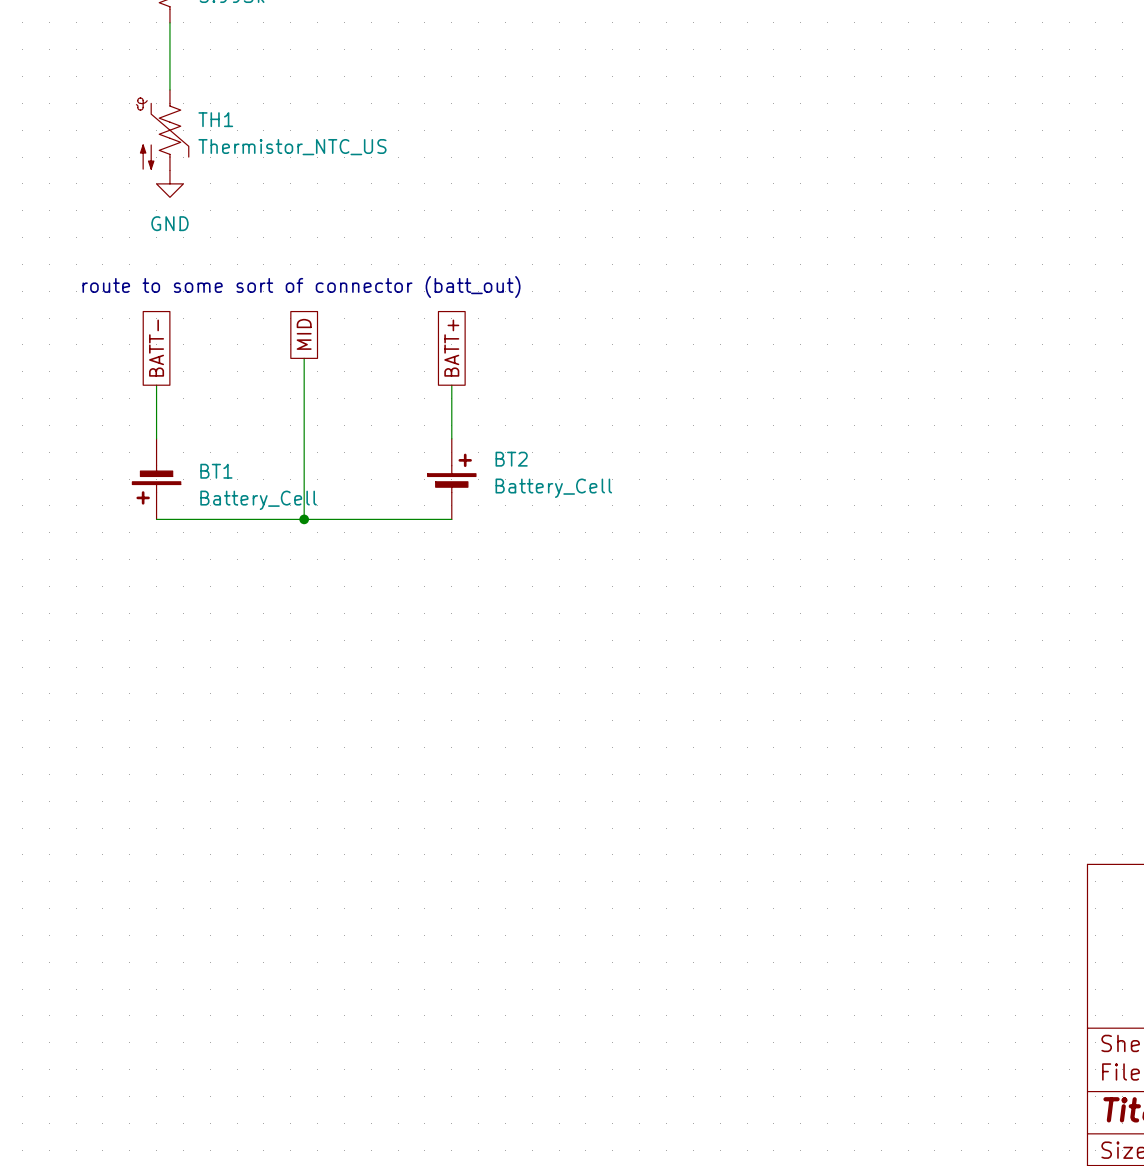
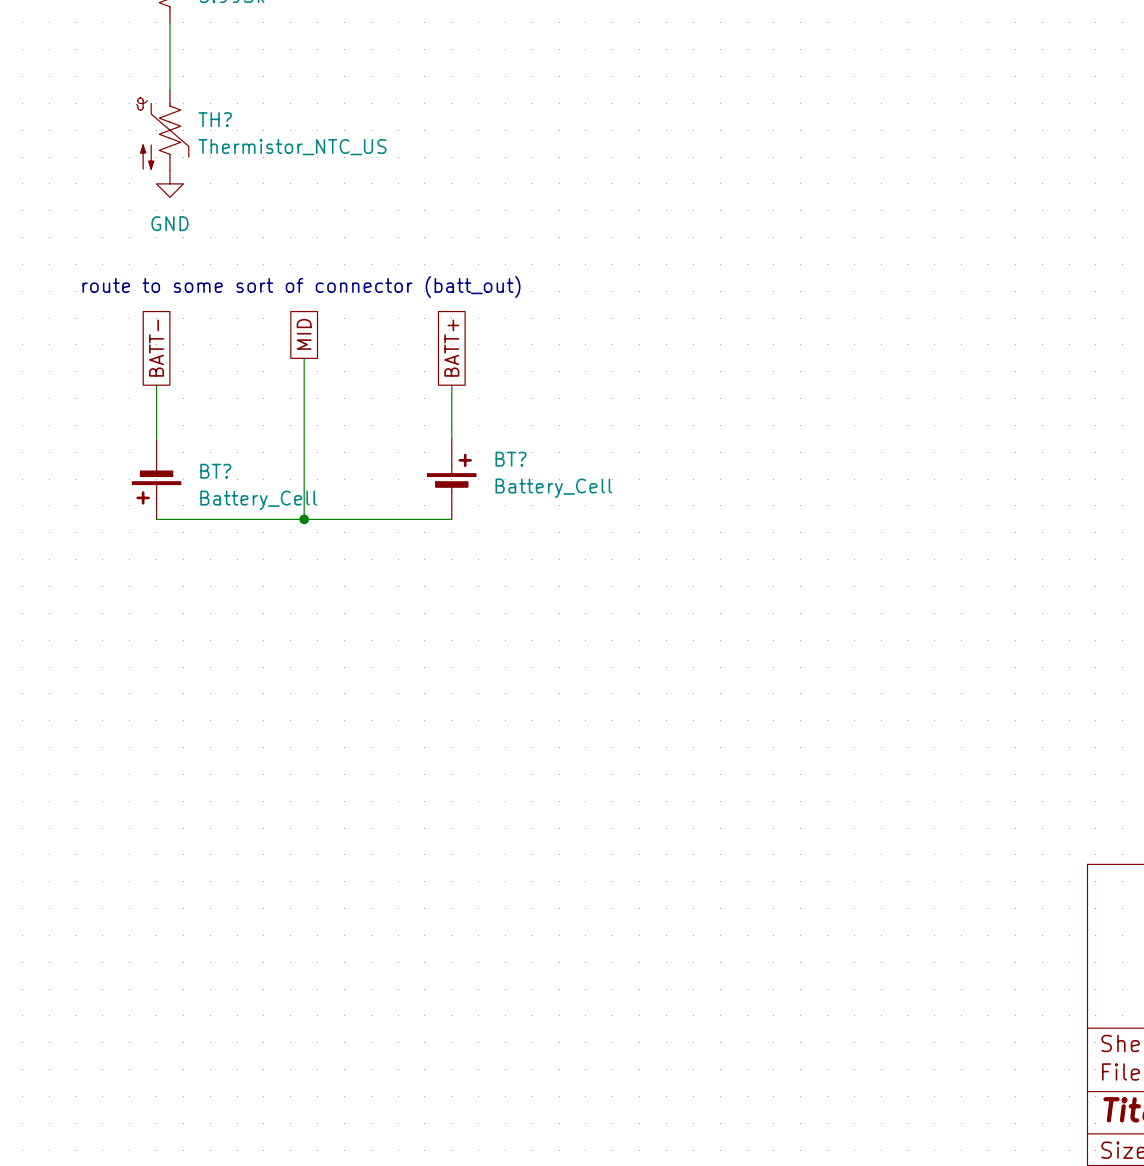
TH1 name: TH1 (215, 119) -> TH? (215, 119)
BT2 name: BT2 (511, 459) -> BT? (511, 459)
BT1 name: BT1 (216, 471) -> BT? (215, 471)

